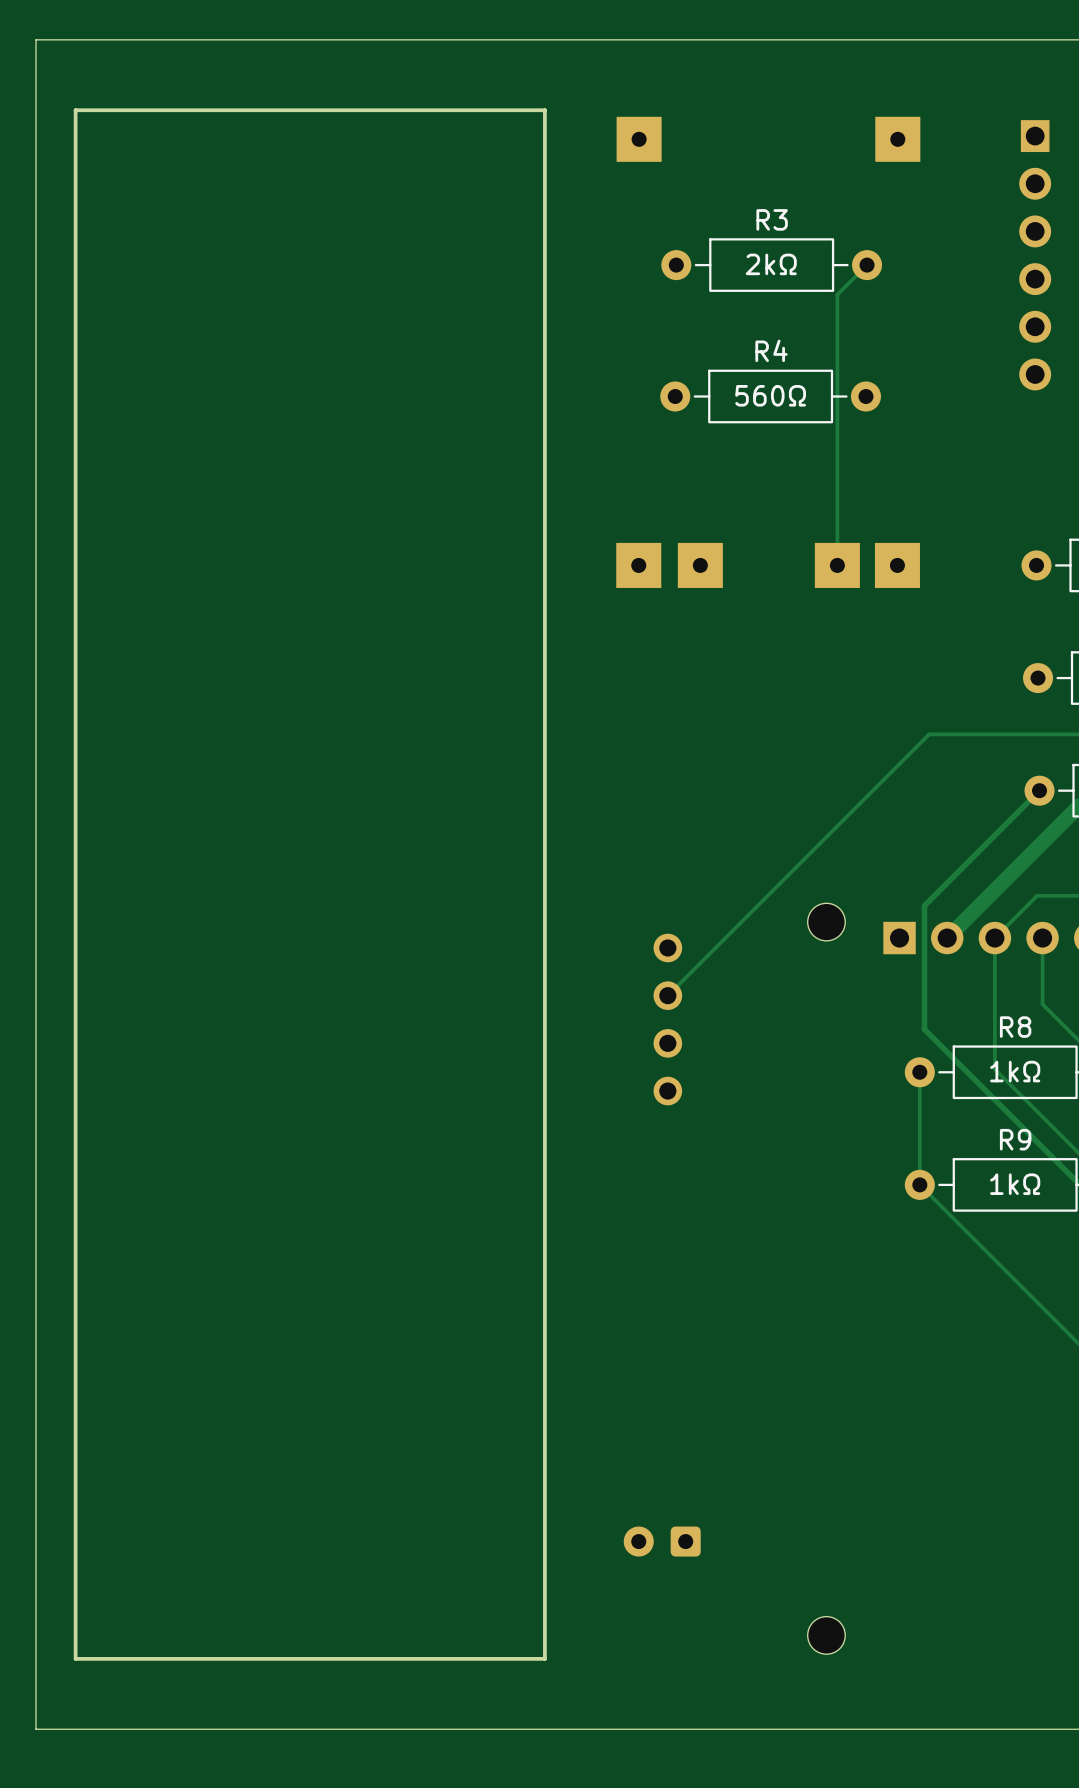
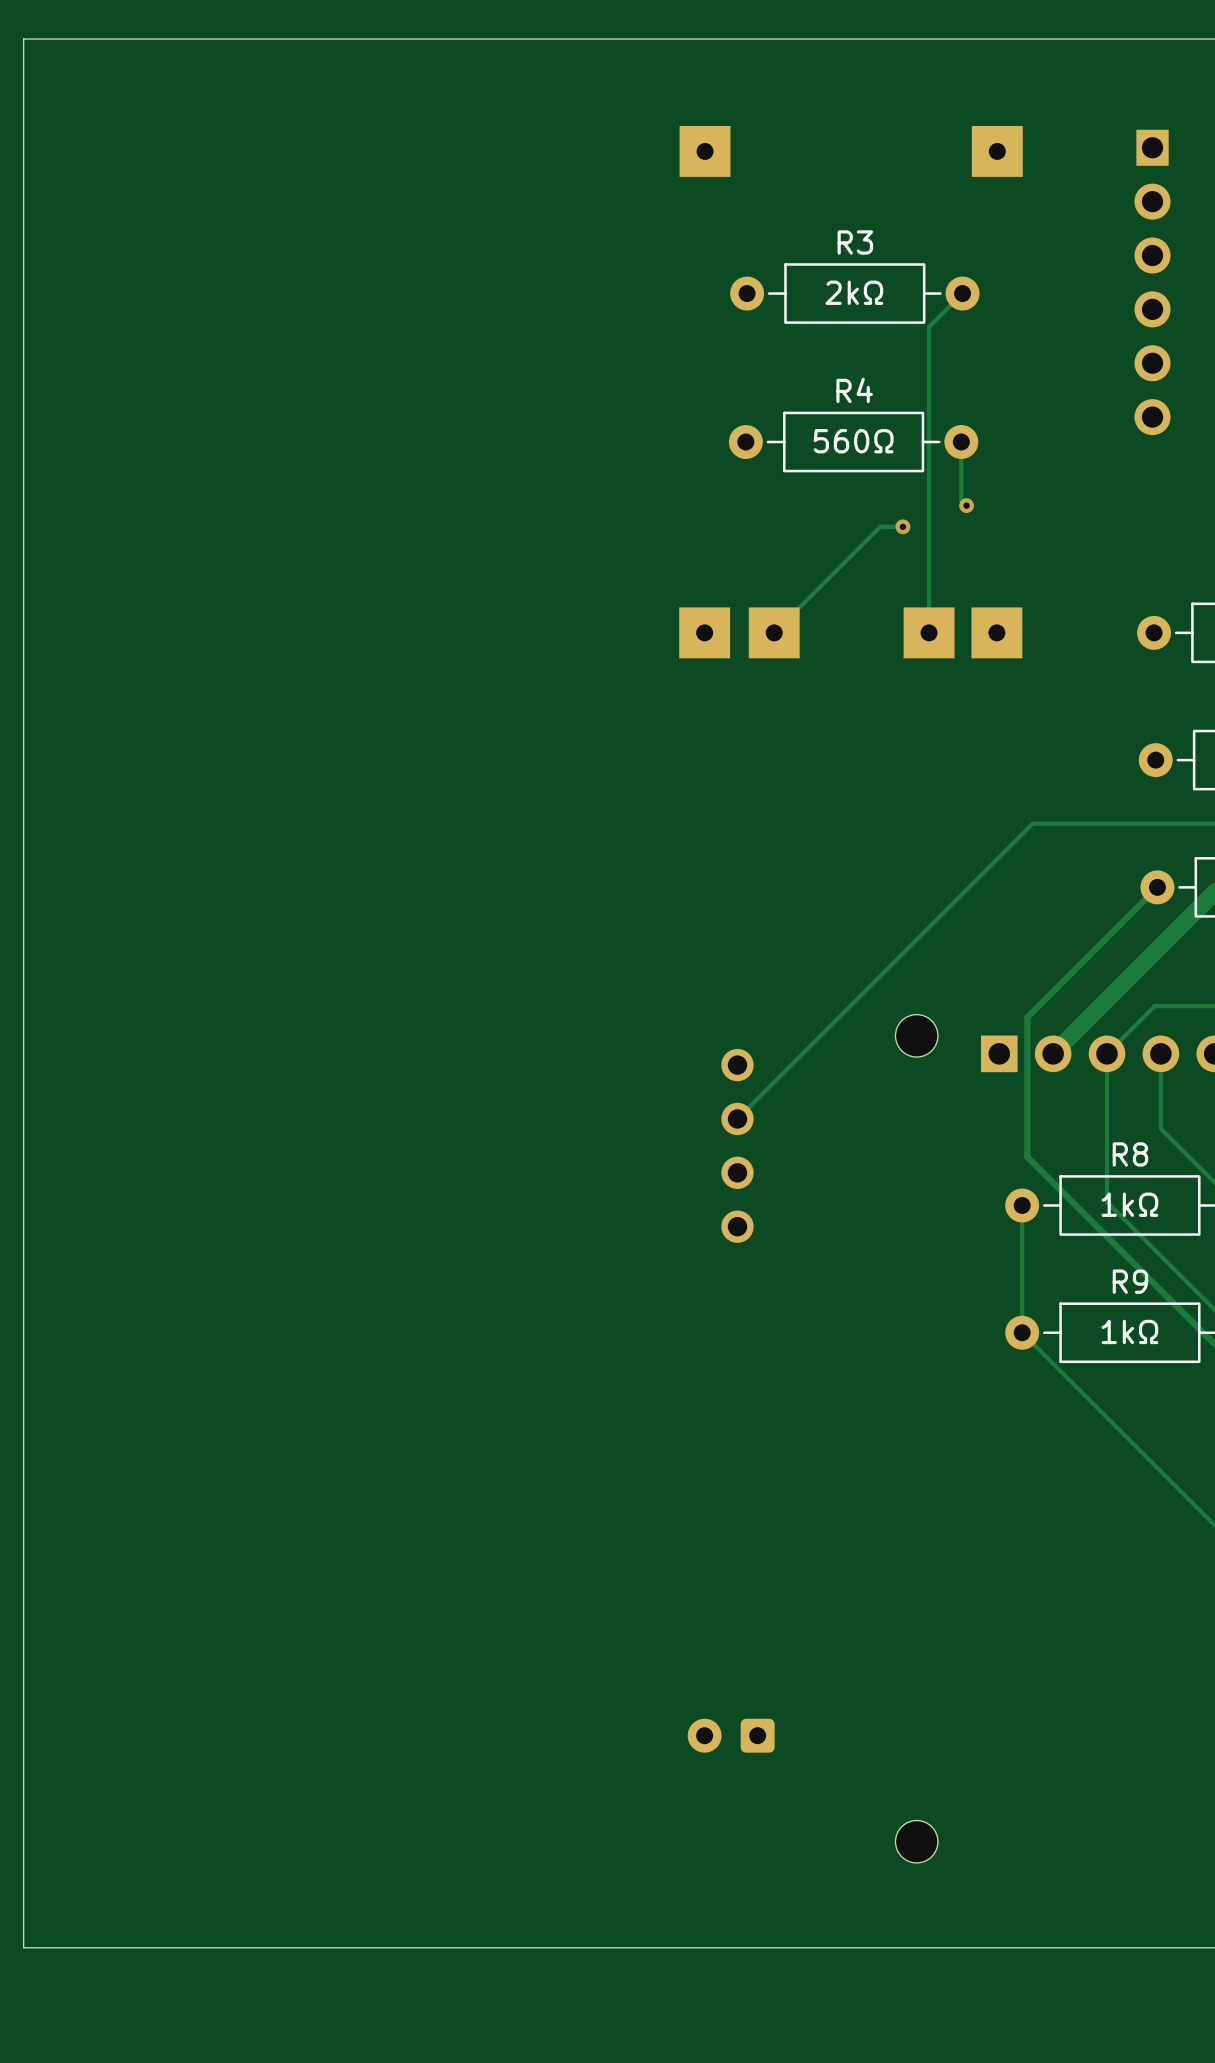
board edge: (544, 110) (75, 110) (75, 1658) (544, 1658) (544, 110) -> none
track: none -> (961, 442) (961, 500) (966, 505)
via: none -> (966, 505)
track: none -> (902, 526) (880, 526) (774, 632)
via: none -> (902, 526)

